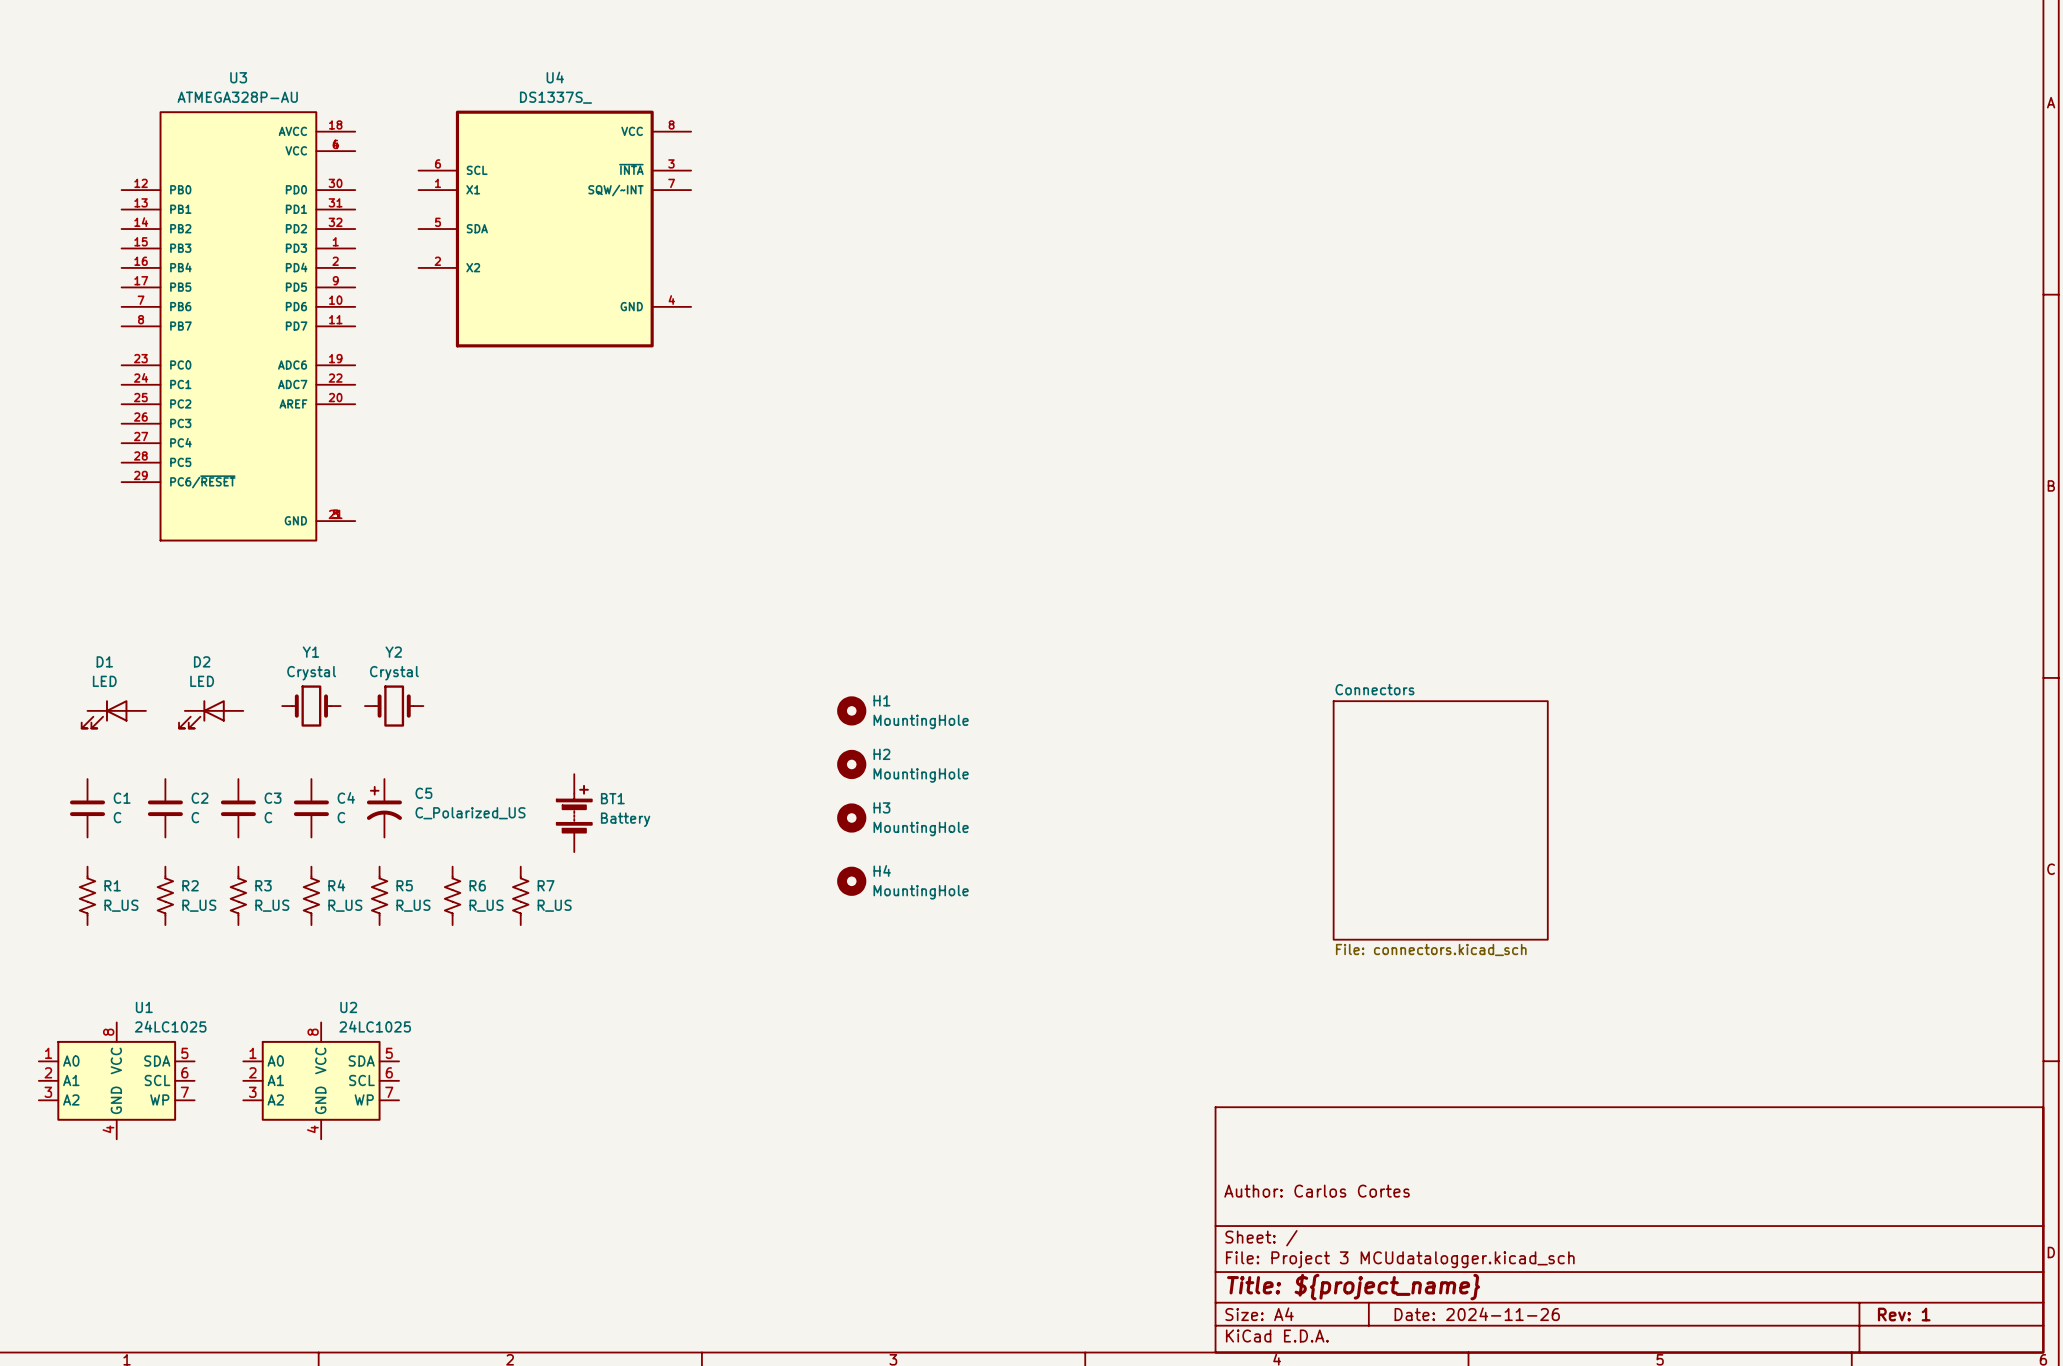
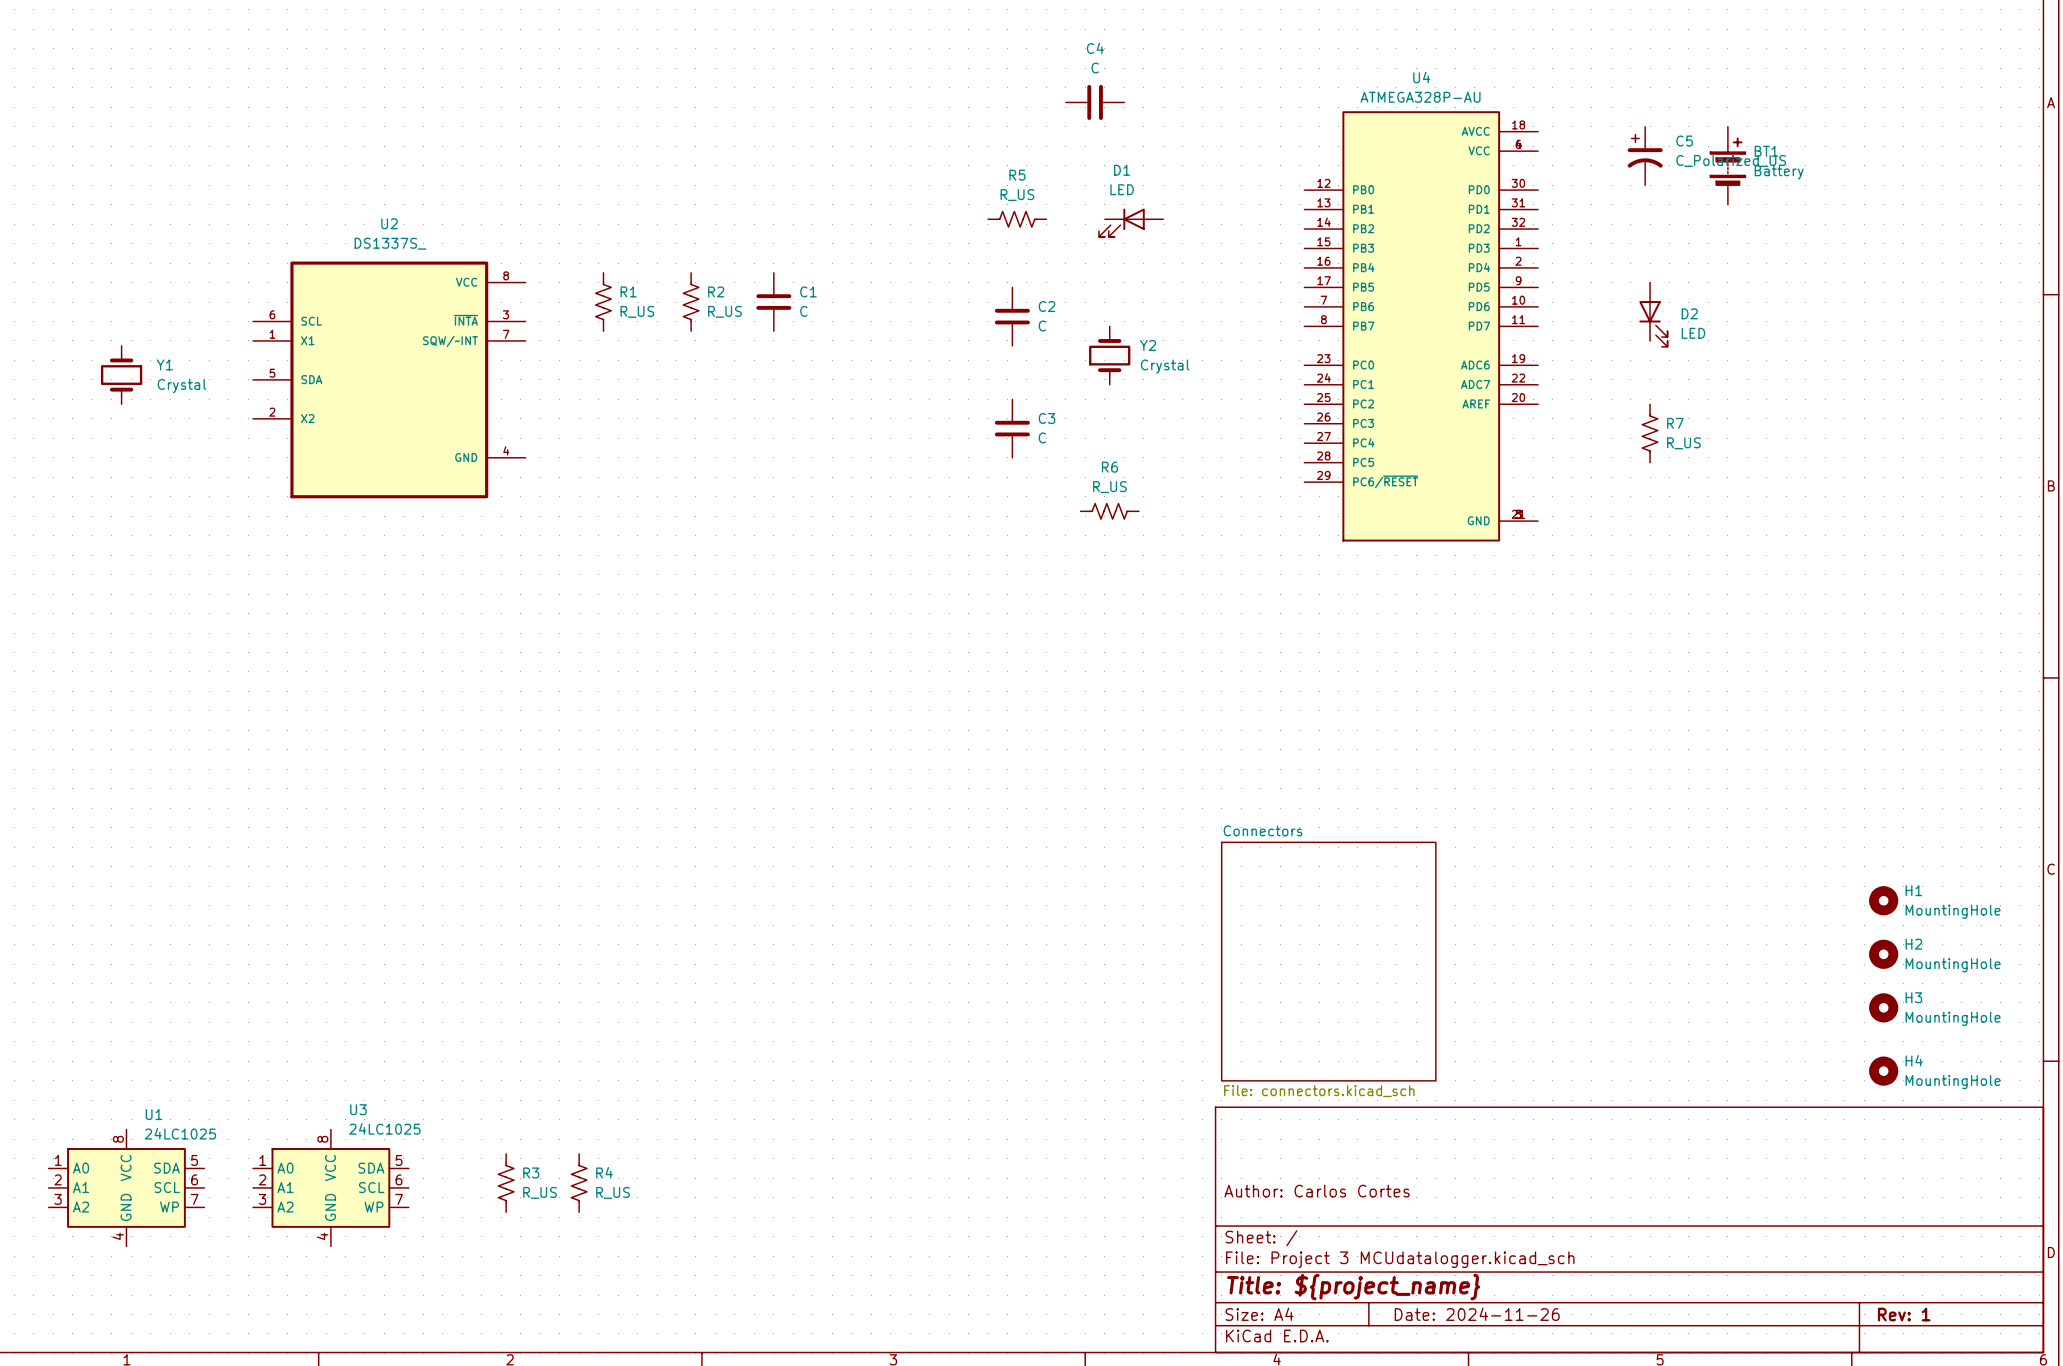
U3 name position: U3 (238, 77) -> U3 (358, 1109)
U4 name position: U4 (555, 77) -> U4 (1421, 77)
U3 value: ATMEGA328P-AU (237, 97) -> 24LC1025 (384, 1128)
U4 value: DS1337S_ (555, 97) -> ATMEGA328P-AU (1420, 97)
U4 symbol: [418, 110, 692, 348] -> [1304, 111, 1539, 542]
U3 symbol: [121, 111, 356, 542] -> [253, 1129, 409, 1247]
Y2 name position: Y2 (393, 652) -> Y2 (1148, 345)
D2 name position: D2 (202, 661) -> D2 (1689, 313)
Y1 value position: Crystal (311, 673) -> Crystal (181, 386)
Y2 value position: Crystal (394, 673) -> Crystal (1165, 366)
D2 value position: LED (202, 681) -> LED (1693, 333)
Y1 rotation: 0° (311, 706) -> 90° clockwise (121, 375)
Y1 position: (311, 706) -> (121, 375)
Y2 rotation: 0° (394, 706) -> 90° clockwise (1109, 355)
Y2 position: (394, 706) -> (1109, 355)
H1 position: (851, 710) -> (1883, 900)
D1 position: (113, 714) -> (1131, 222)
D2 rotation: 0° (201, 714) -> 90° counterclockwise (1653, 323)
D2 position: (211, 714) -> (1653, 314)
H2 position: (851, 764) -> (1883, 954)
C4 name position: C4 (346, 797) -> C4 (1095, 48)
C1 position: (87, 808) -> (773, 302)
C2 position: (165, 808) -> (1012, 316)
C3 position: (238, 808) -> (1012, 428)
C4 rotation: 0° (311, 808) -> 90° clockwise (1095, 102)
C4 position: (311, 808) -> (1095, 102)
C5 position: (384, 808) -> (1645, 156)
BT1 position: (574, 813) -> (1727, 165)
C4 value position: C (341, 817) -> C (1095, 68)
H3 position: (851, 818) -> (1883, 1007)
sheet Connectors position: (1440, 820) -> (1328, 961)
H4 position: (851, 881) -> (1883, 1071)
R5 name position: R5 (404, 885) -> R5 (1017, 175)
R6 name position: R6 (477, 885) -> R6 (1109, 467)
R1 position: (87, 895) -> (603, 302)
R2 position: (165, 895) -> (691, 302)
R3 position: (238, 895) -> (506, 1183)
R4 position: (311, 895) -> (579, 1183)
R5 rotation: 0° (379, 895) -> 90° clockwise (1017, 219)
R5 position: (379, 895) -> (1017, 219)
R6 rotation: 0° (452, 895) -> 90° clockwise (1109, 511)
R6 position: (452, 895) -> (1109, 511)
R7 position: (520, 895) -> (1650, 433)
R5 value position: R_US (413, 905) -> R_US (1017, 195)
R6 value position: R_US (486, 905) -> R_US (1109, 487)
U2 name position: U2 (348, 1007) -> U2 (389, 223)
U2 symbol: [243, 1022, 400, 1140] -> [253, 261, 526, 499]
U2 value: 24LC1025 (375, 1026) -> DS1337S_ (390, 243)
U1 position: (116, 1080) -> (126, 1187)

